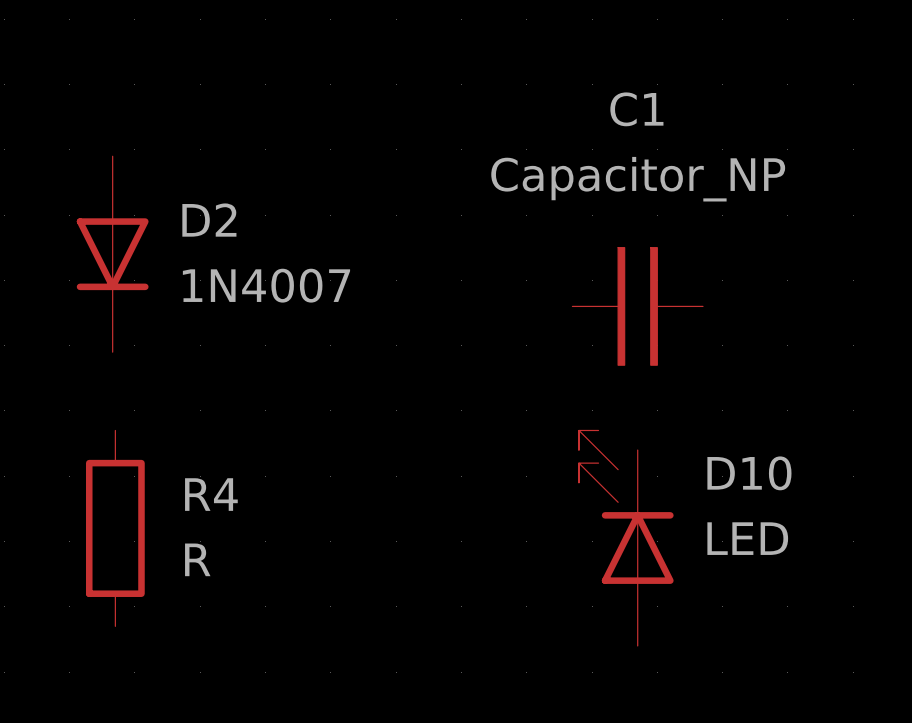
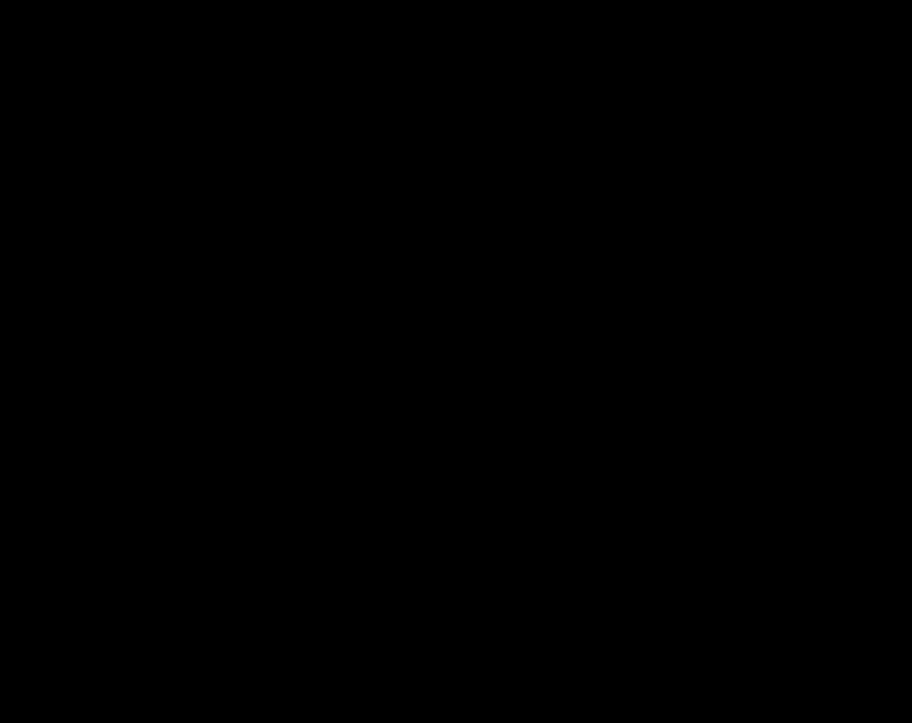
D2: 1N4007 (112, 254) -> none
C1: Capacitor_NP (637, 306) -> none
R4: R (115, 528) -> none
D10: LED (626, 538) -> none

